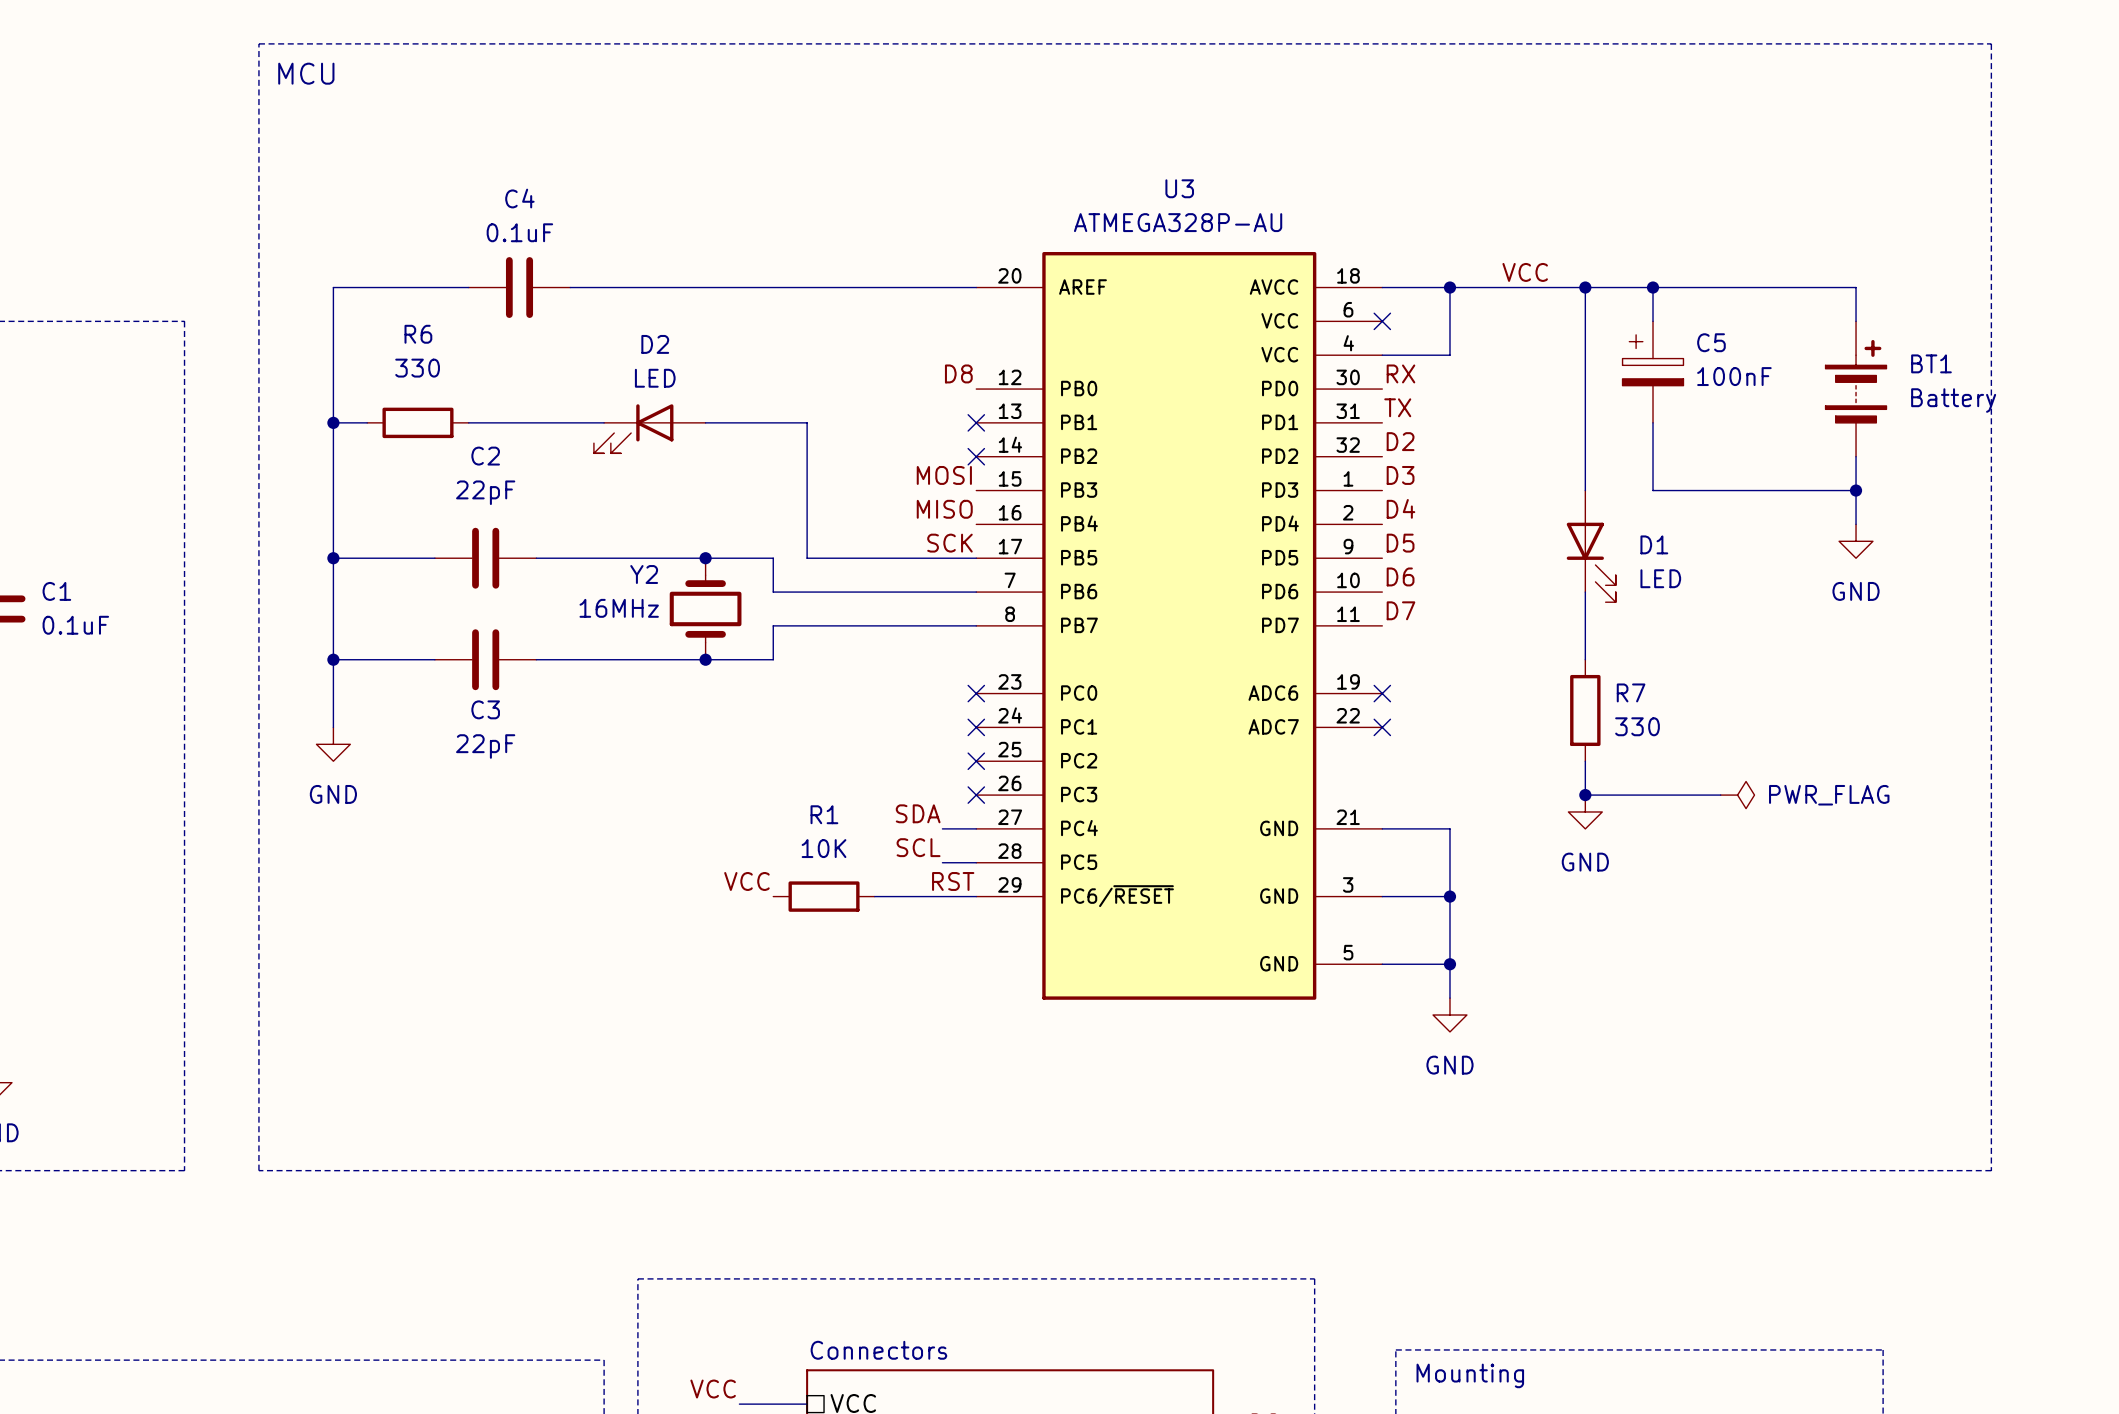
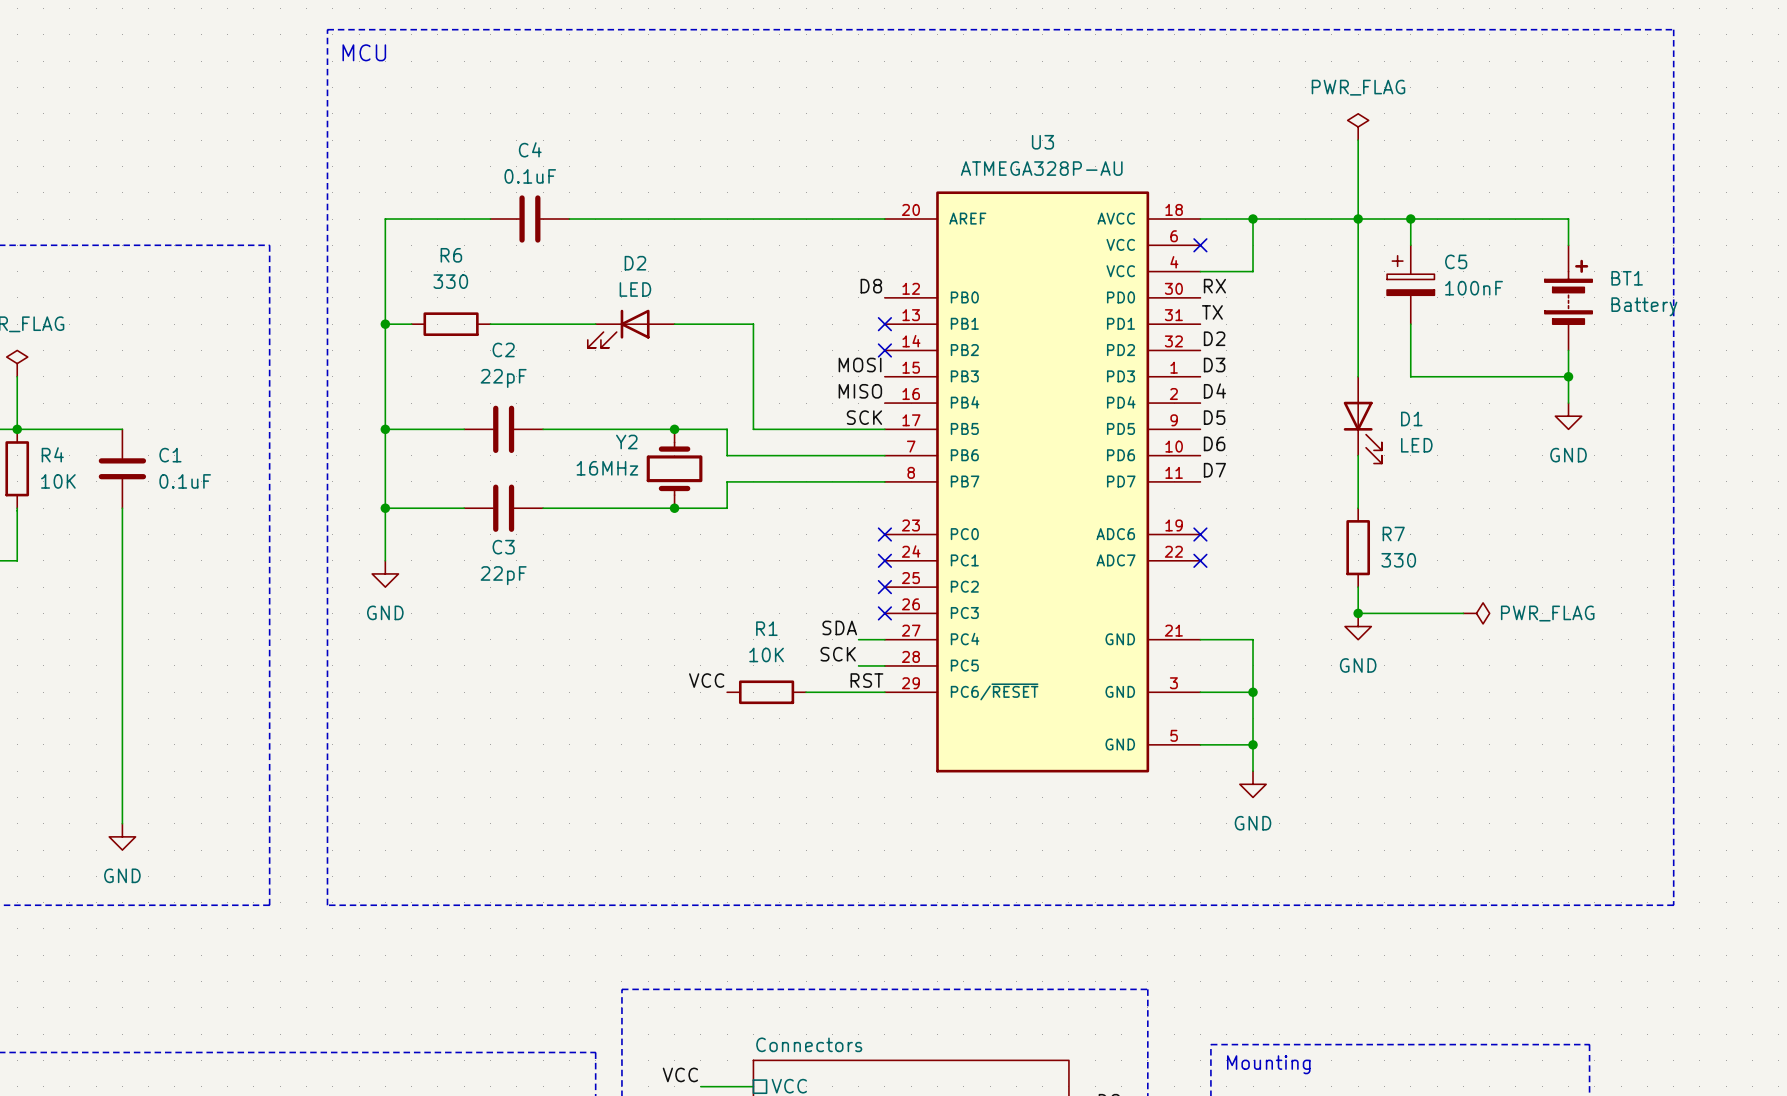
power symbol: none -> PWR_FLAG (1358, 126)
wire: none -> (1358, 140) (1358, 219)
label: VCC (1525, 272) -> none
label: SCL (918, 847) -> SCK (838, 654)

